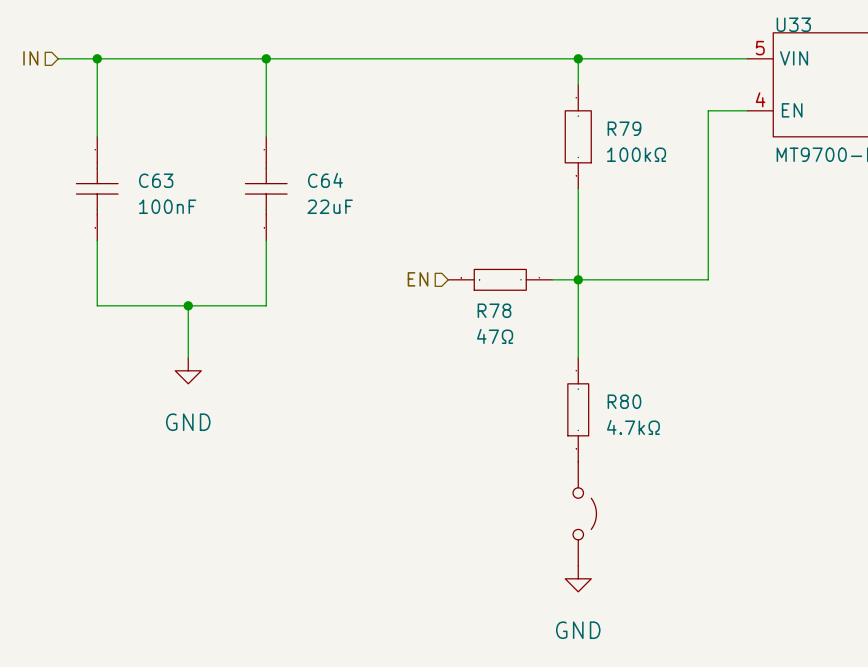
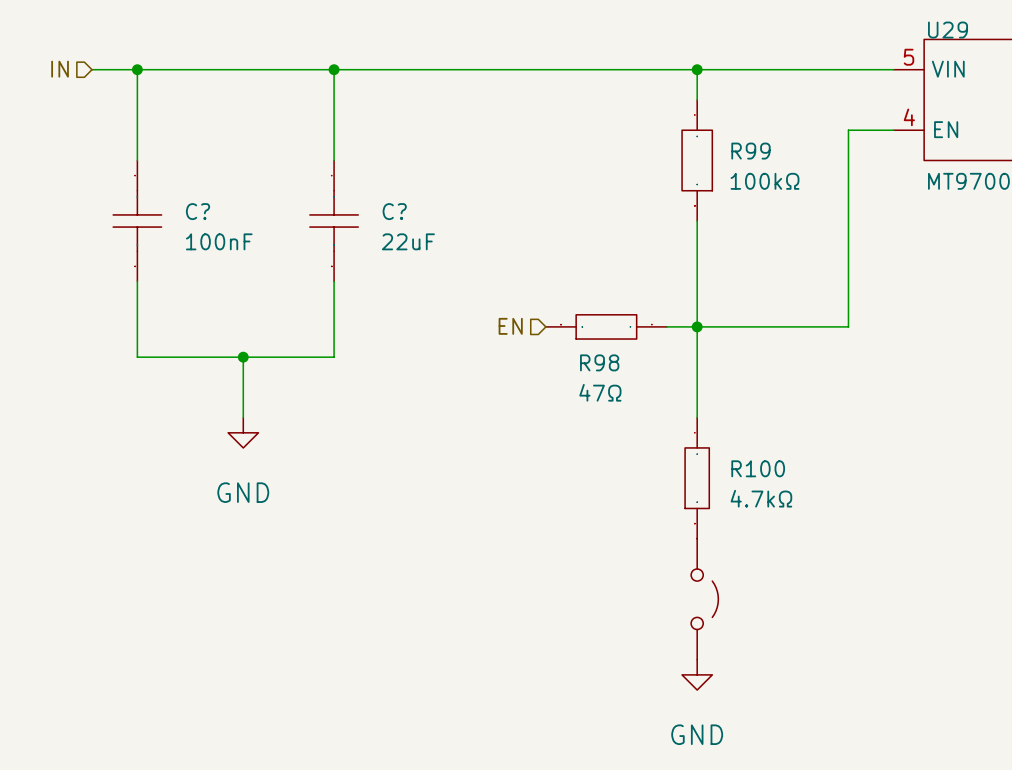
U33 name: U33 (793, 24) -> U29 (948, 30)
R79 name: R79 (624, 128) -> R99 (750, 151)
C63 name: C63 (156, 180) -> C? (198, 211)
C64 name: C64 (325, 180) -> C? (394, 211)
R78 name: R78 (494, 310) -> R98 (599, 362)
R80 name: R80 (624, 401) -> R100 (758, 468)

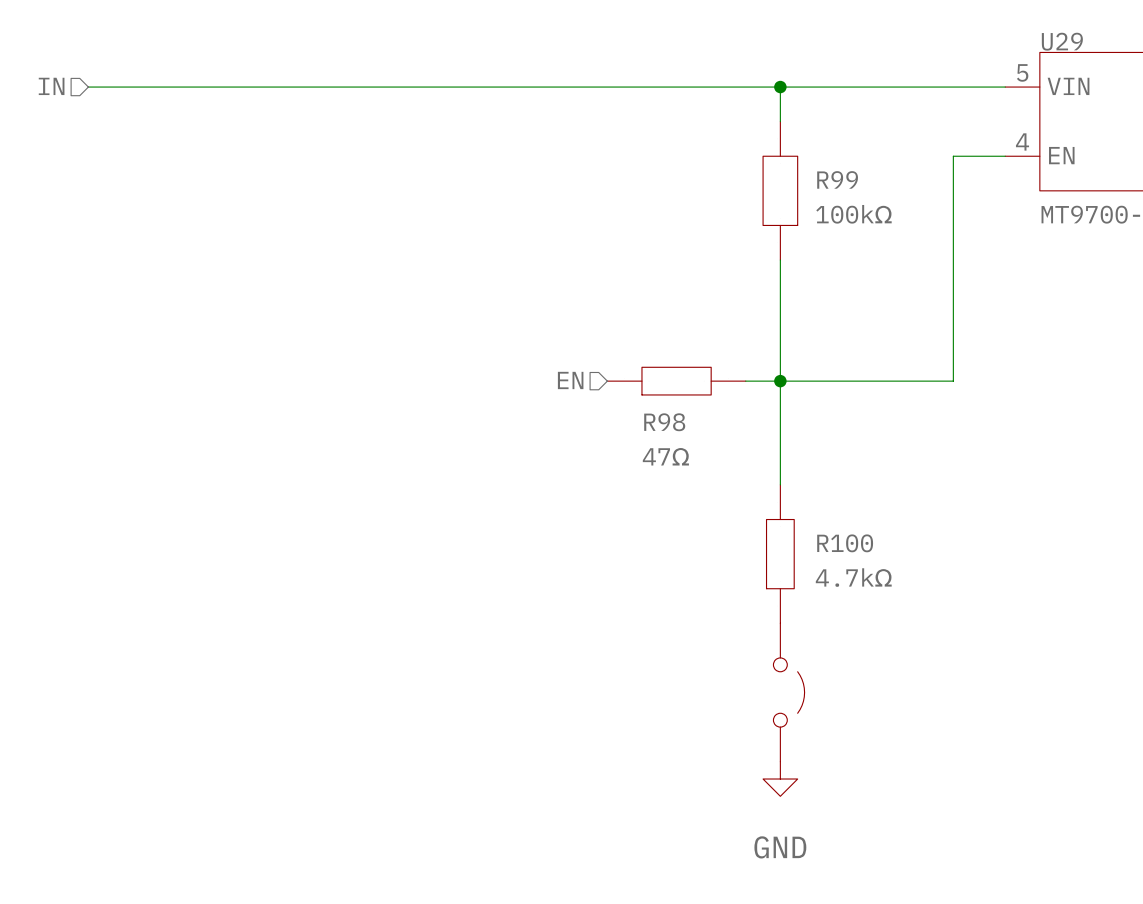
wire: (137, 69) (137, 160) -> none
junction: (137, 69) -> none
wire: (334, 69) (334, 160) -> none
junction: (334, 69) -> none
C?: 100nF (137, 221) -> none
C?: 22uF (334, 221) -> none
wire: (137, 281) (137, 357) (334, 357) (334, 281) -> none
wire: (243, 357) (243, 417) -> none
junction: (243, 357) -> none
power symbol: GND (243, 432) -> none

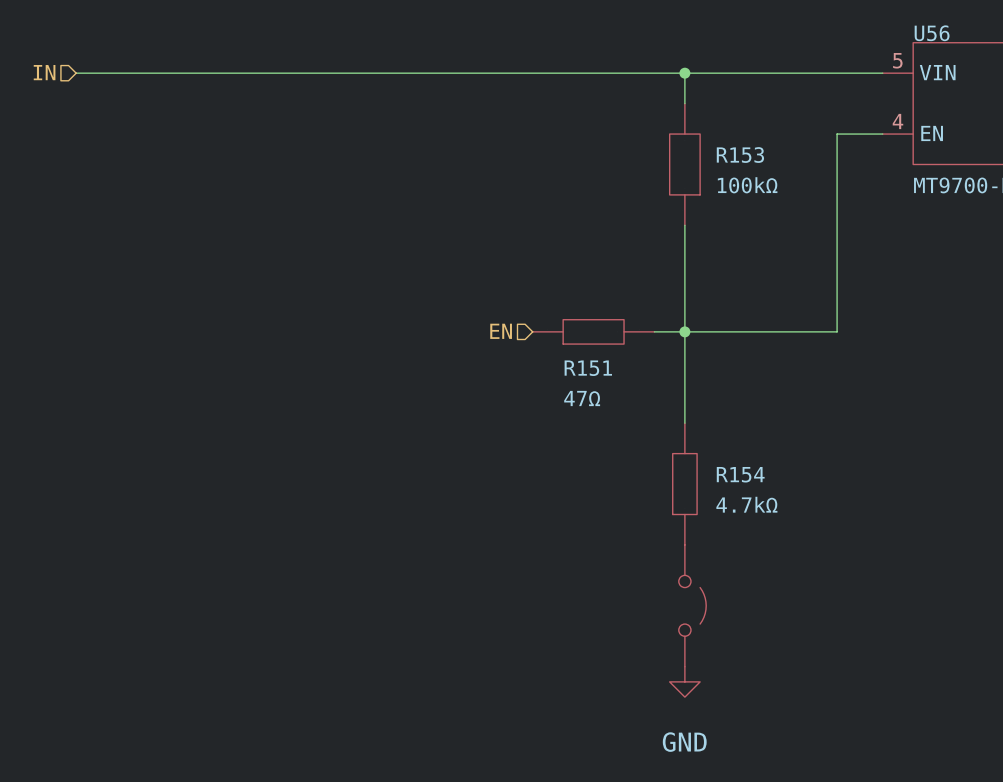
U29 name: U29 (1062, 41) -> U56 (932, 33)
R99 name: R99 (837, 179) -> R153 (740, 155)
R98 name: R98 (664, 422) -> R151 (588, 368)
R100 name: R100 (845, 543) -> R154 (740, 474)

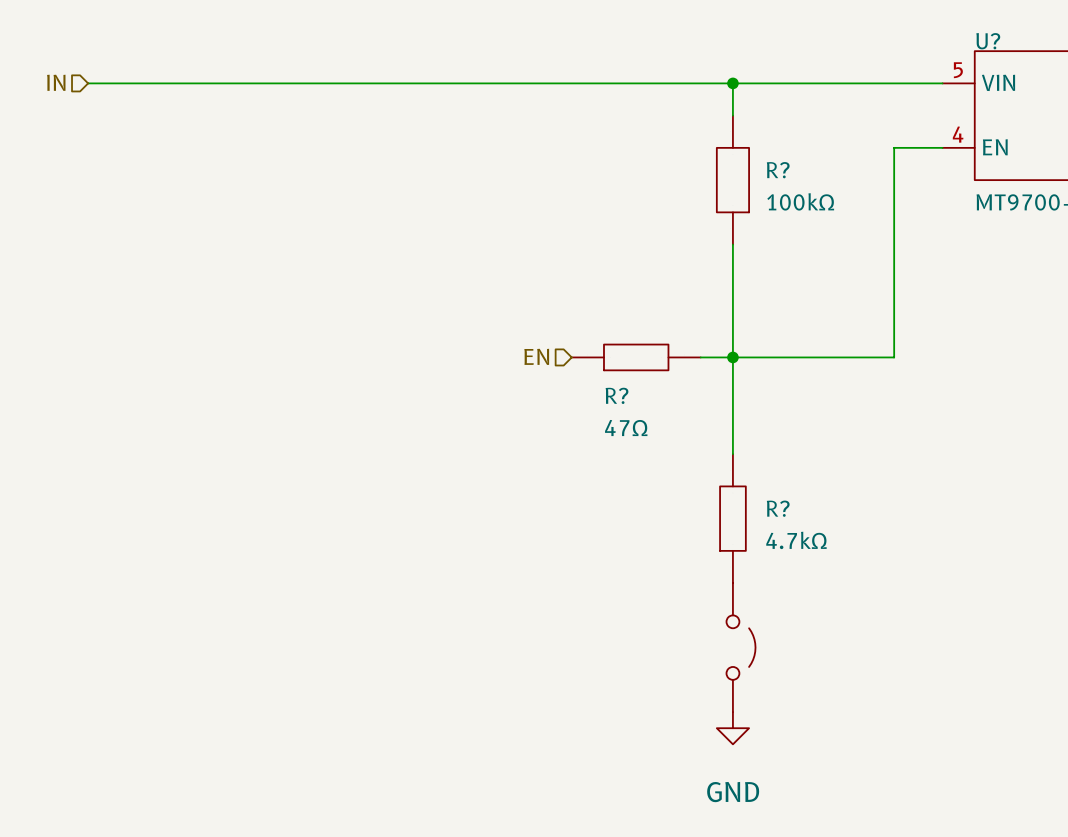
U56 name: U56 (932, 33) -> U? (988, 41)
R153 name: R153 (740, 155) -> R? (778, 170)
R151 name: R151 (588, 368) -> R? (617, 395)
R154 name: R154 (740, 474) -> R? (778, 508)

